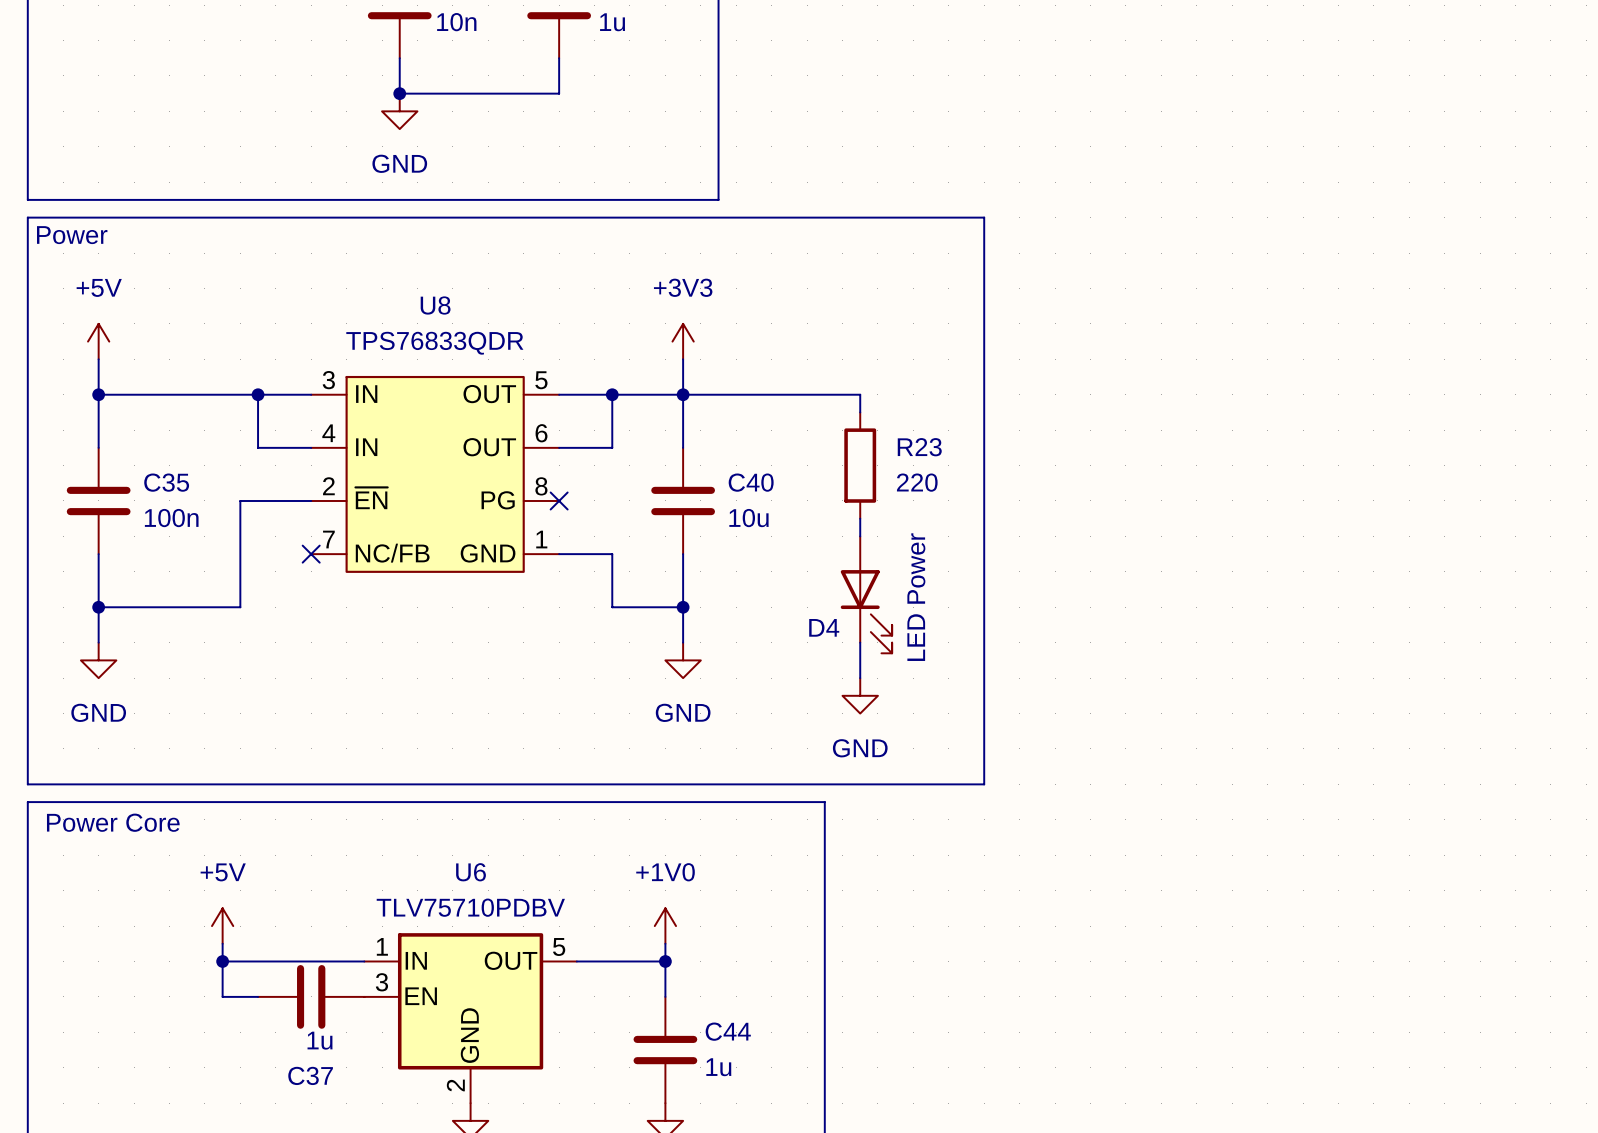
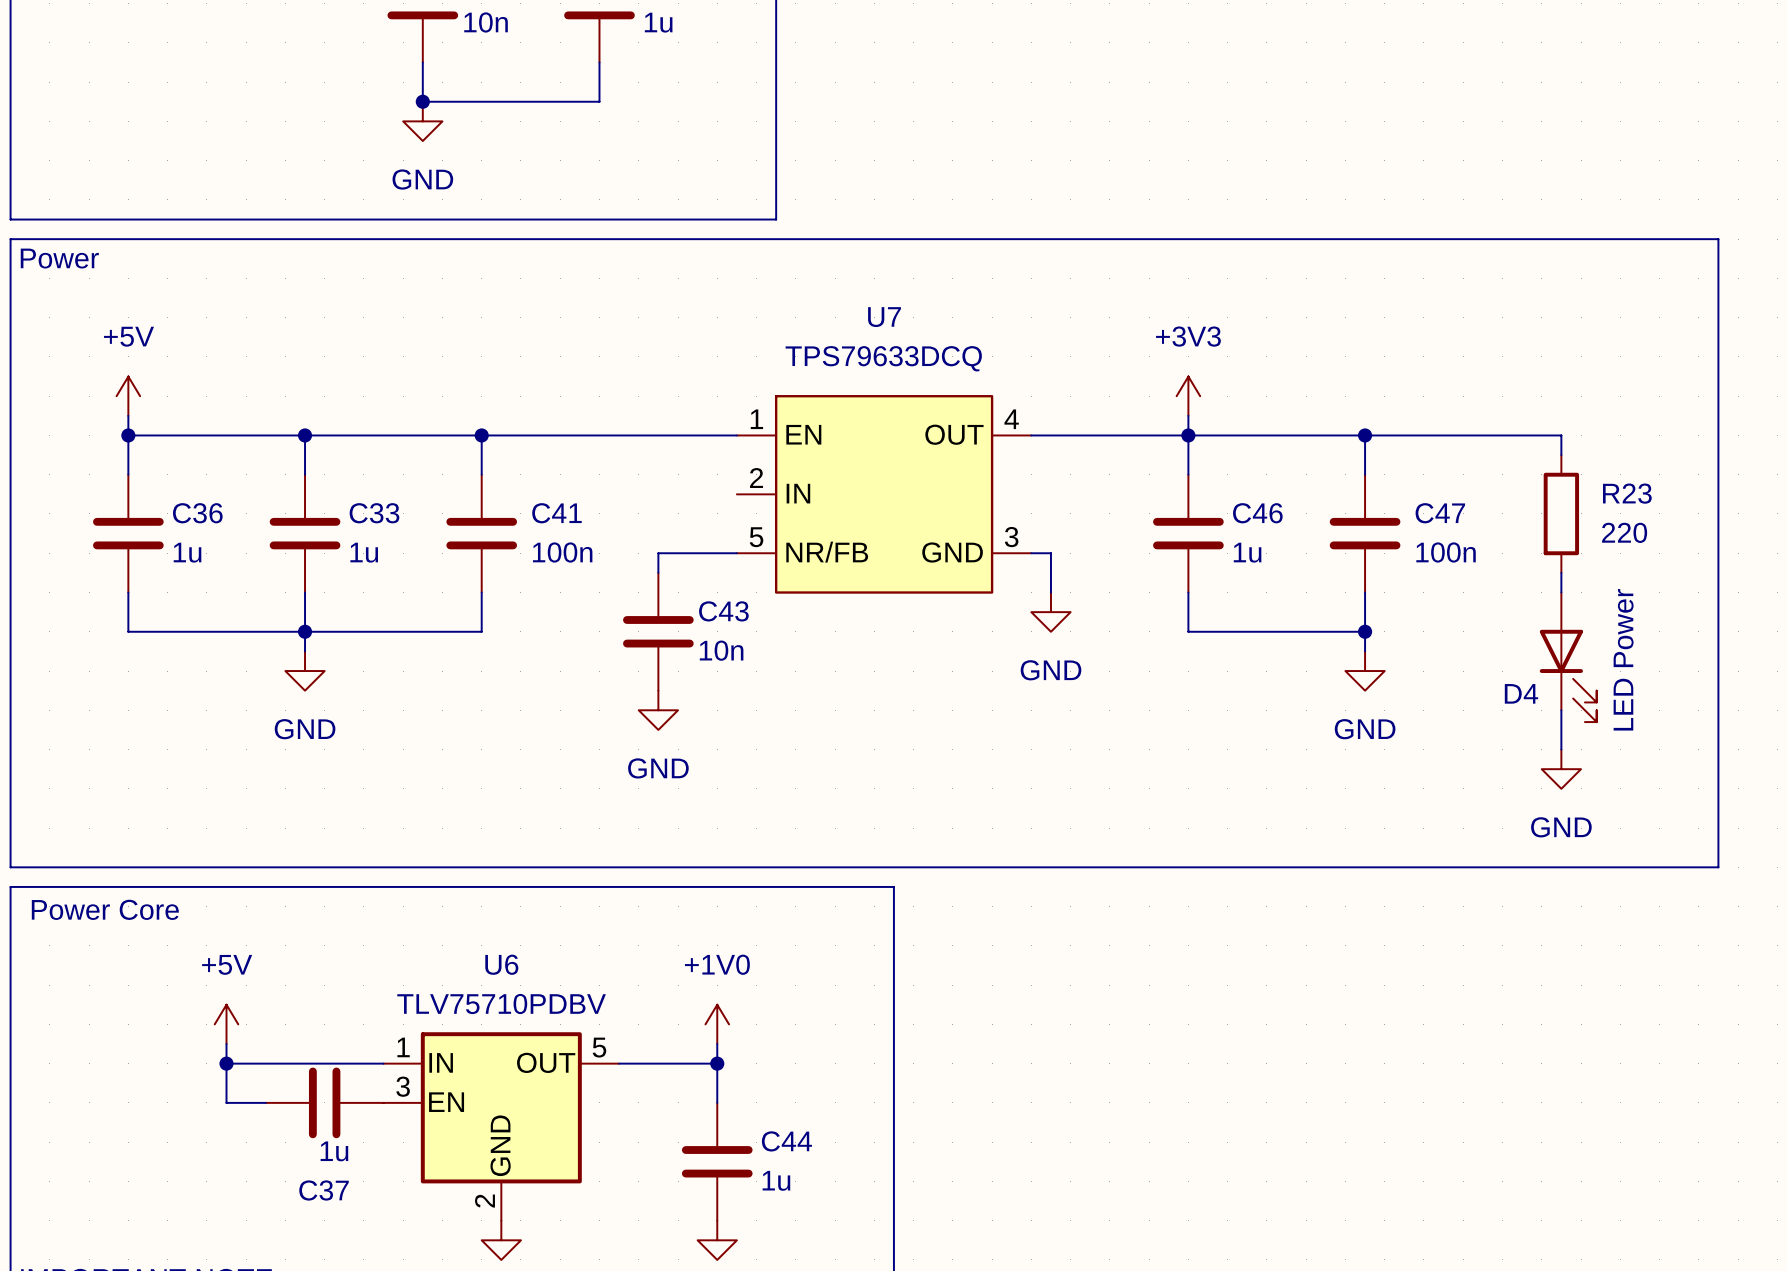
line: (984, 217) (984, 784) -> (1070, 239) (1718, 239) (1718, 867) (1070, 867)
power symbol position: +5V (98, 341) -> +5V (128, 396)
power symbol: +3V3 (683, 341) -> none
wire: (98, 359) (98, 447) -> none
wire: (683, 359) (683, 447) -> none
power symbol: none -> +3V3 (1188, 396)
wire: none -> (128, 415) (128, 474)
wire: none -> (1188, 415) (1188, 474)
wire: (98, 394) (134, 394) -> none
junction position: (98, 394) -> (128, 435)
wire: (258, 394) (258, 447) (311, 447) -> none
junction position: (258, 394) -> (305, 435)
wire: none -> (305, 435) (305, 474)
junction: none -> (481, 435)
wire: (612, 394) (612, 447) (559, 447) -> none
junction: (612, 394) -> none
junction: (683, 394) -> none
wire: none -> (1031, 435) (1561, 435) (1561, 455)
junction: none -> (1188, 435)
wire: none -> (1365, 435) (1365, 474)
junction: none -> (1365, 435)
U7: none -> TPS79633DCQ (884, 494)
R23 position: (860, 465) -> (1561, 513)
U8: TPS76833QDR (435, 474) -> none
C36: none -> 1u (128, 533)
C33: none -> 1u (305, 533)
C41: none -> 100n (481, 533)
C46: none -> 1u (1188, 533)
C47: none -> 100n (1365, 533)
C35: 100n (98, 500) -> none
wire: (311, 500) (240, 500) (240, 607) (98, 607) -> none
no-connect mark: (559, 500) -> none
wire: none -> (736, 553) (658, 553) (658, 572)
C40: 10u (683, 500) -> none
wire: none -> (1031, 553) (1050, 553) (1050, 592)
wire: none -> (1561, 572) (1561, 592)
wire: none -> (128, 592) (128, 631) (481, 631) (481, 592)
wire: none -> (305, 592) (305, 651)
wire: none -> (1188, 592) (1188, 631) (1365, 631)
wire: none -> (1365, 592) (1365, 651)
wire: (98, 554) (98, 642) -> none
no-connect mark: (311, 554) -> none
wire: (559, 554) (612, 554) (612, 607) (683, 607) -> none
wire: (683, 554) (683, 642) -> none
power symbol: none -> GND (1050, 612)
junction: none -> (305, 631)
C43: none -> 10n (658, 631)
junction: none -> (1365, 631)
D4 position: (866, 594) -> (1568, 657)
junction: (98, 607) -> none
power symbol: none -> GND (305, 671)
junction: (683, 607) -> none
power symbol: none -> GND (1365, 671)
wire: (860, 642) (860, 678) -> none
wire: none -> (1561, 710) (1561, 749)
power symbol: GND (98, 660) -> none
power symbol position: GND (683, 660) -> GND (658, 710)
power symbol: GND (860, 695) -> none
power symbol: none -> GND (1561, 769)

